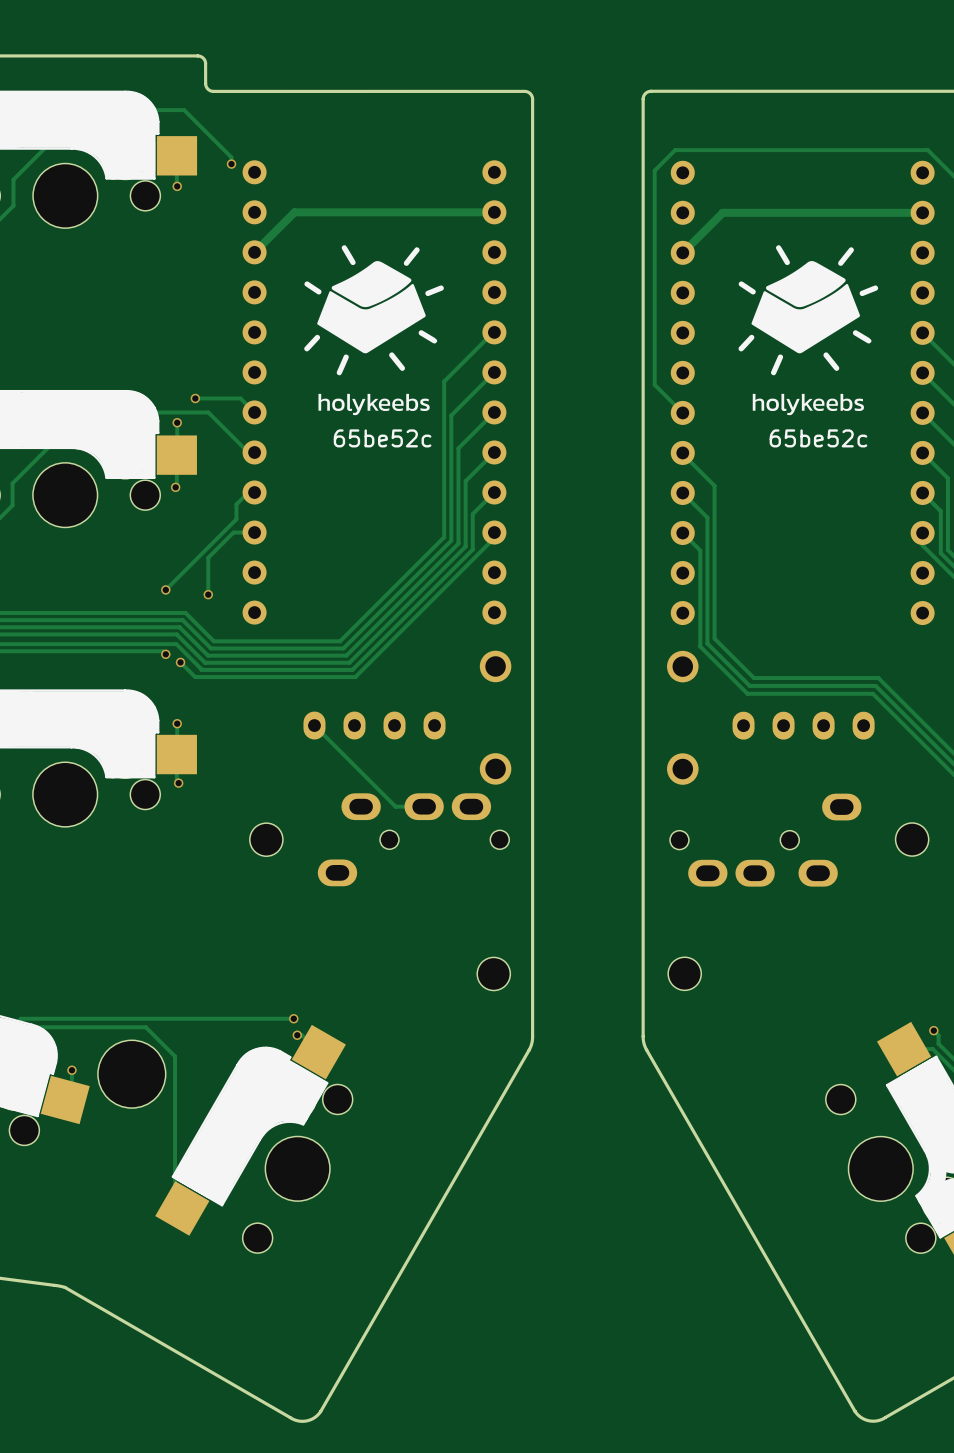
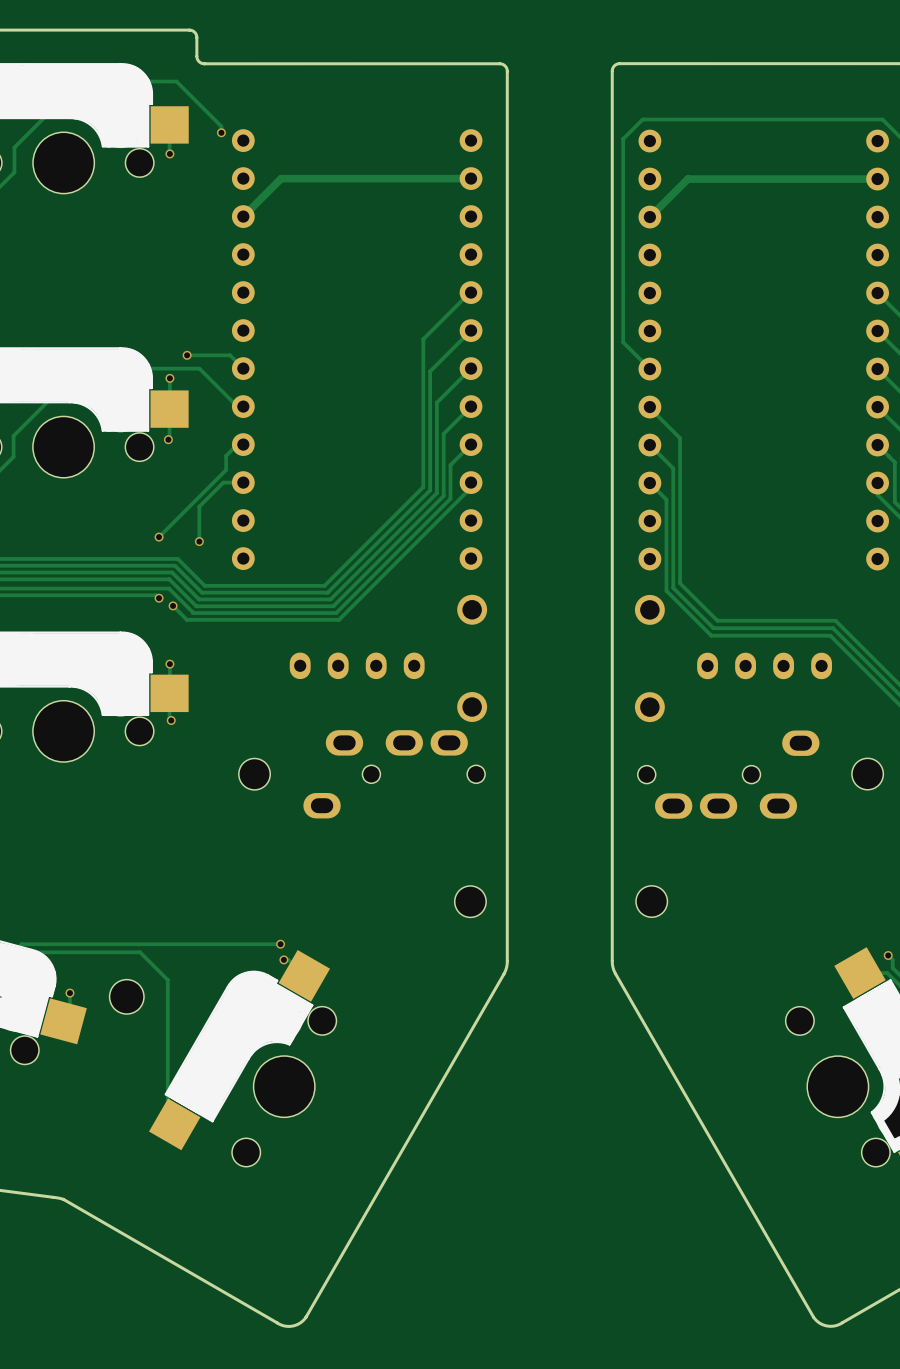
drawing: [304, 245, 444, 416] -> none
drawing: [738, 245, 879, 416] -> none
text: 65be52c (382, 438) -> none
text: 65be52c (818, 438) -> none
track: (314, 725) (395, 806) (424, 806) -> none
part footprint: [97, 1040, 166, 1109] -> [109, 979, 144, 1015]

